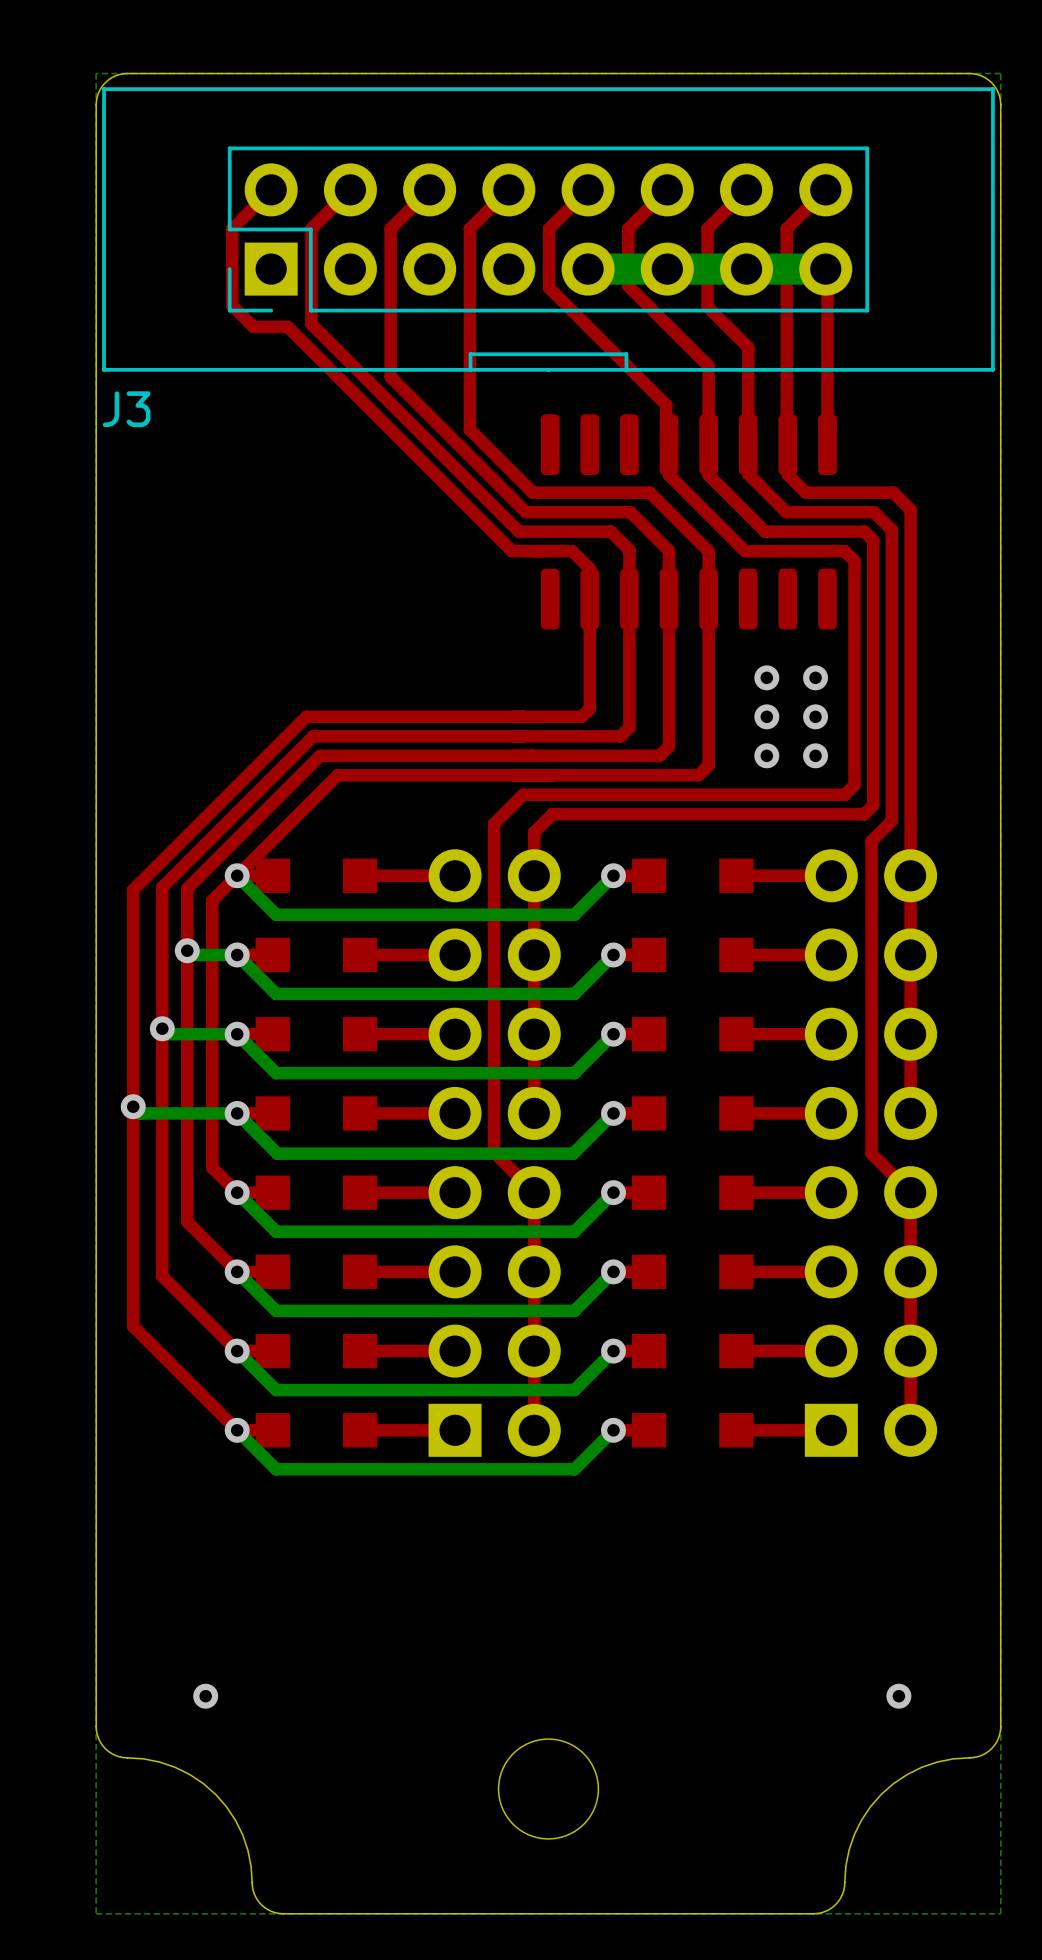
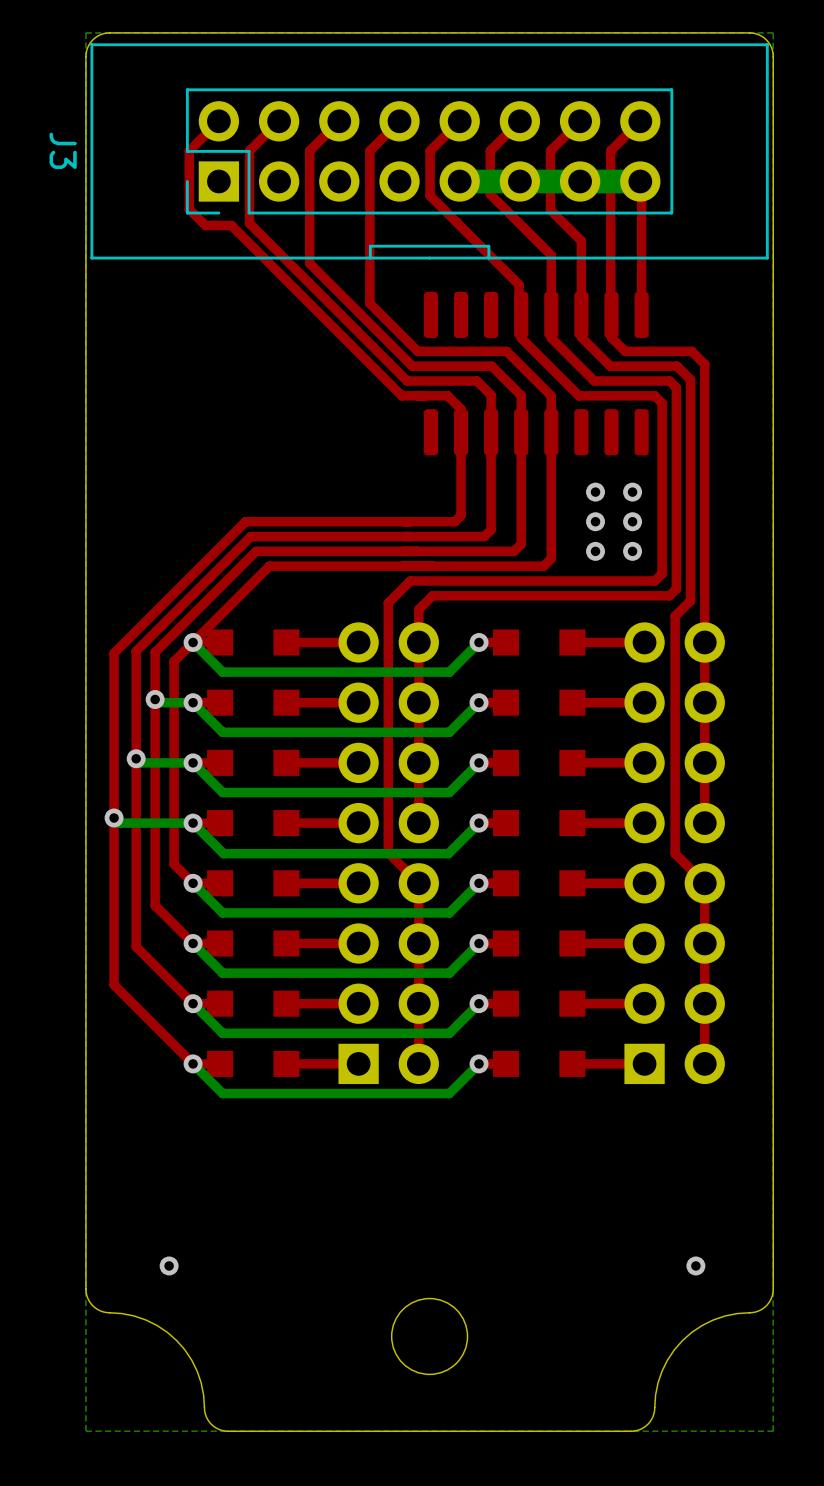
J3 name rotation: 0° (126, 409) -> 90° clockwise (63, 150)
J3 name position: J3 (126, 409) -> J3 (63, 150)

